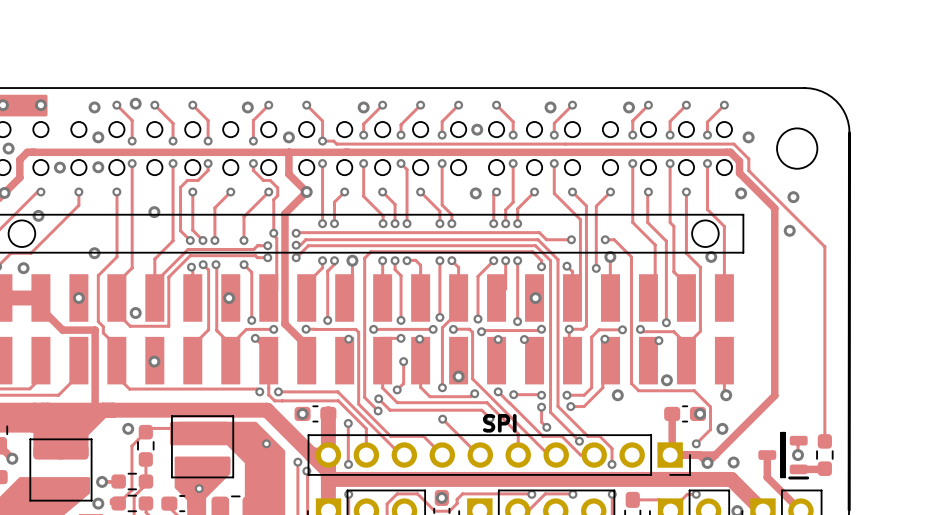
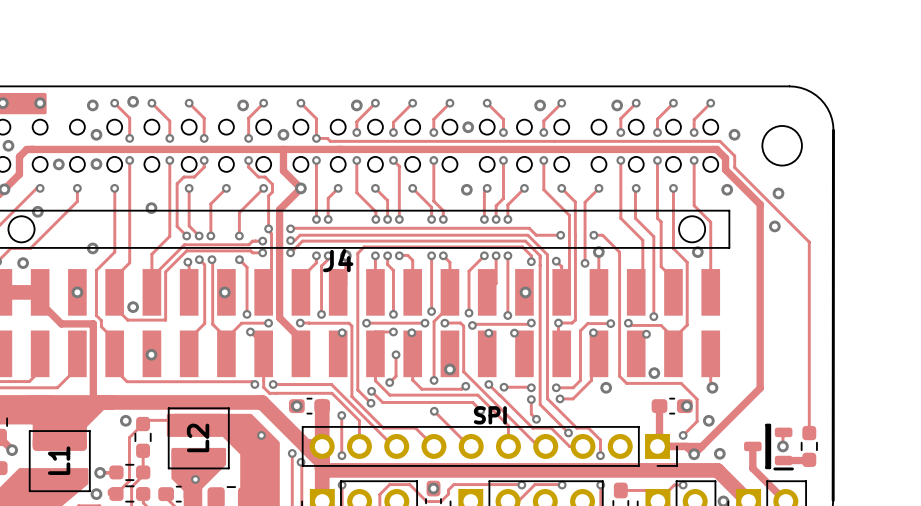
J4 name: none -> J4 (338, 260)
L2 name: none -> L2 (198, 437)
L1 name: none -> L1 (59, 460)

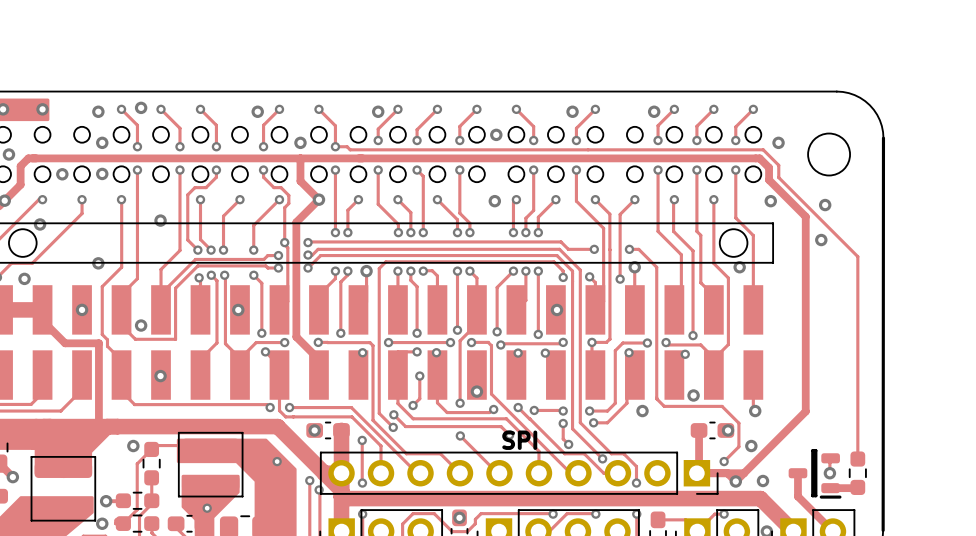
J4 name: J4 (338, 260) -> none
L2 name: L2 (198, 437) -> none
L1 name: L1 (59, 460) -> none

